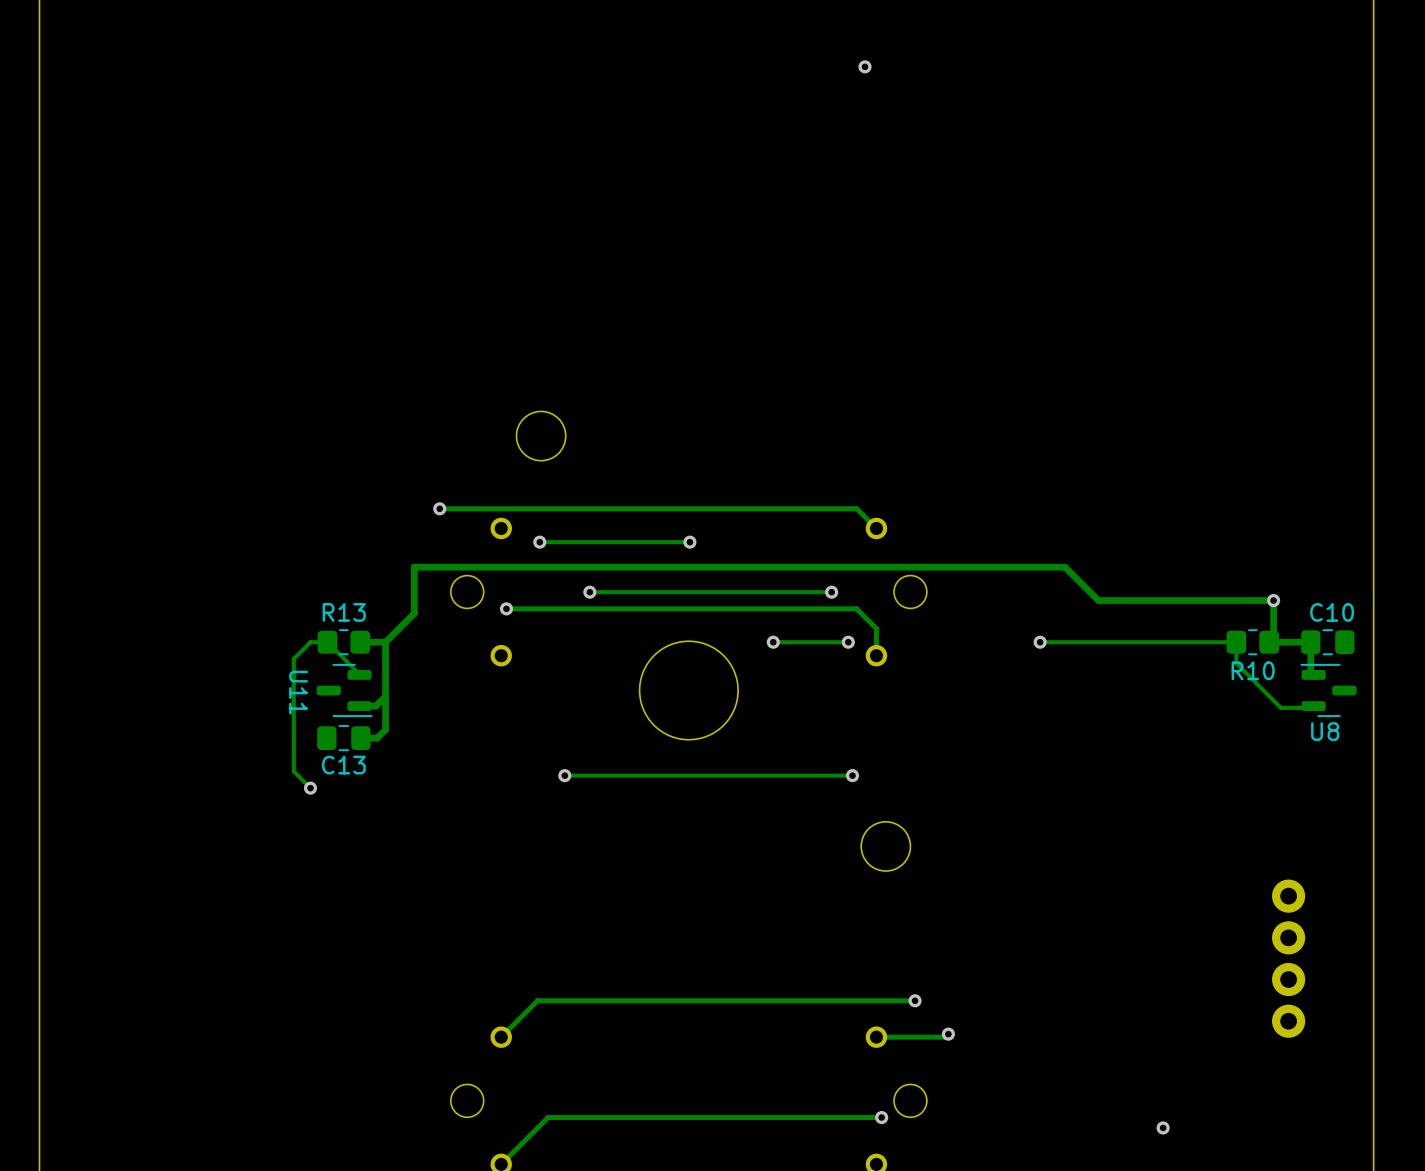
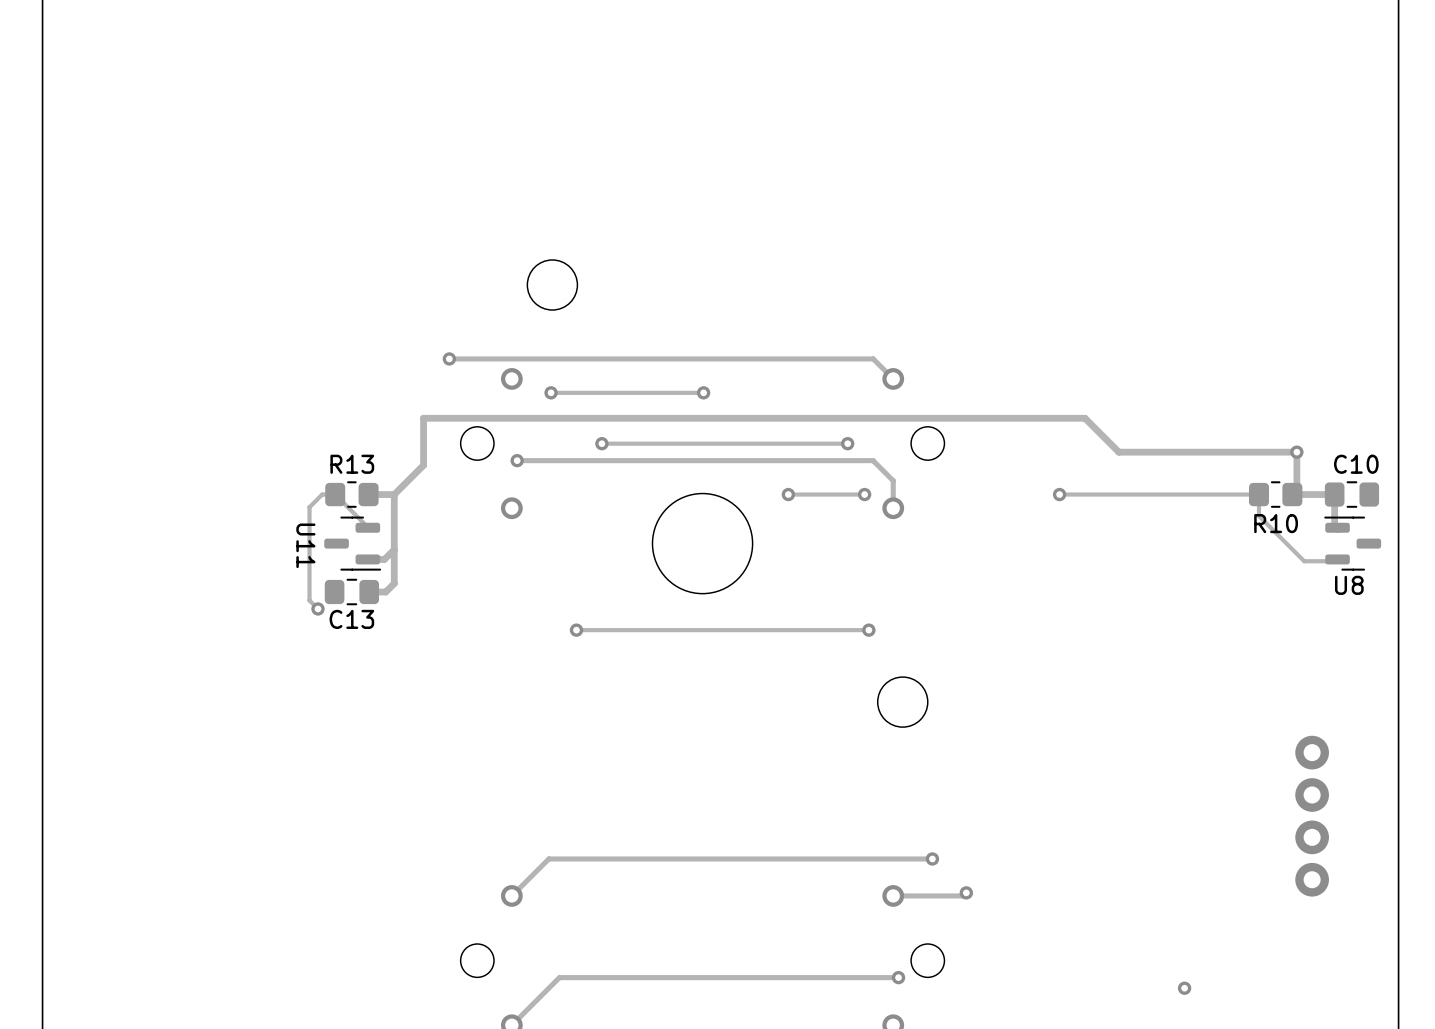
track: (314, 642) (310, 642) (293, 658) (293, 771) (310, 788) -> (322, 494) (309, 507) (309, 600) (317, 608)
via position: (310, 788) -> (317, 608)

